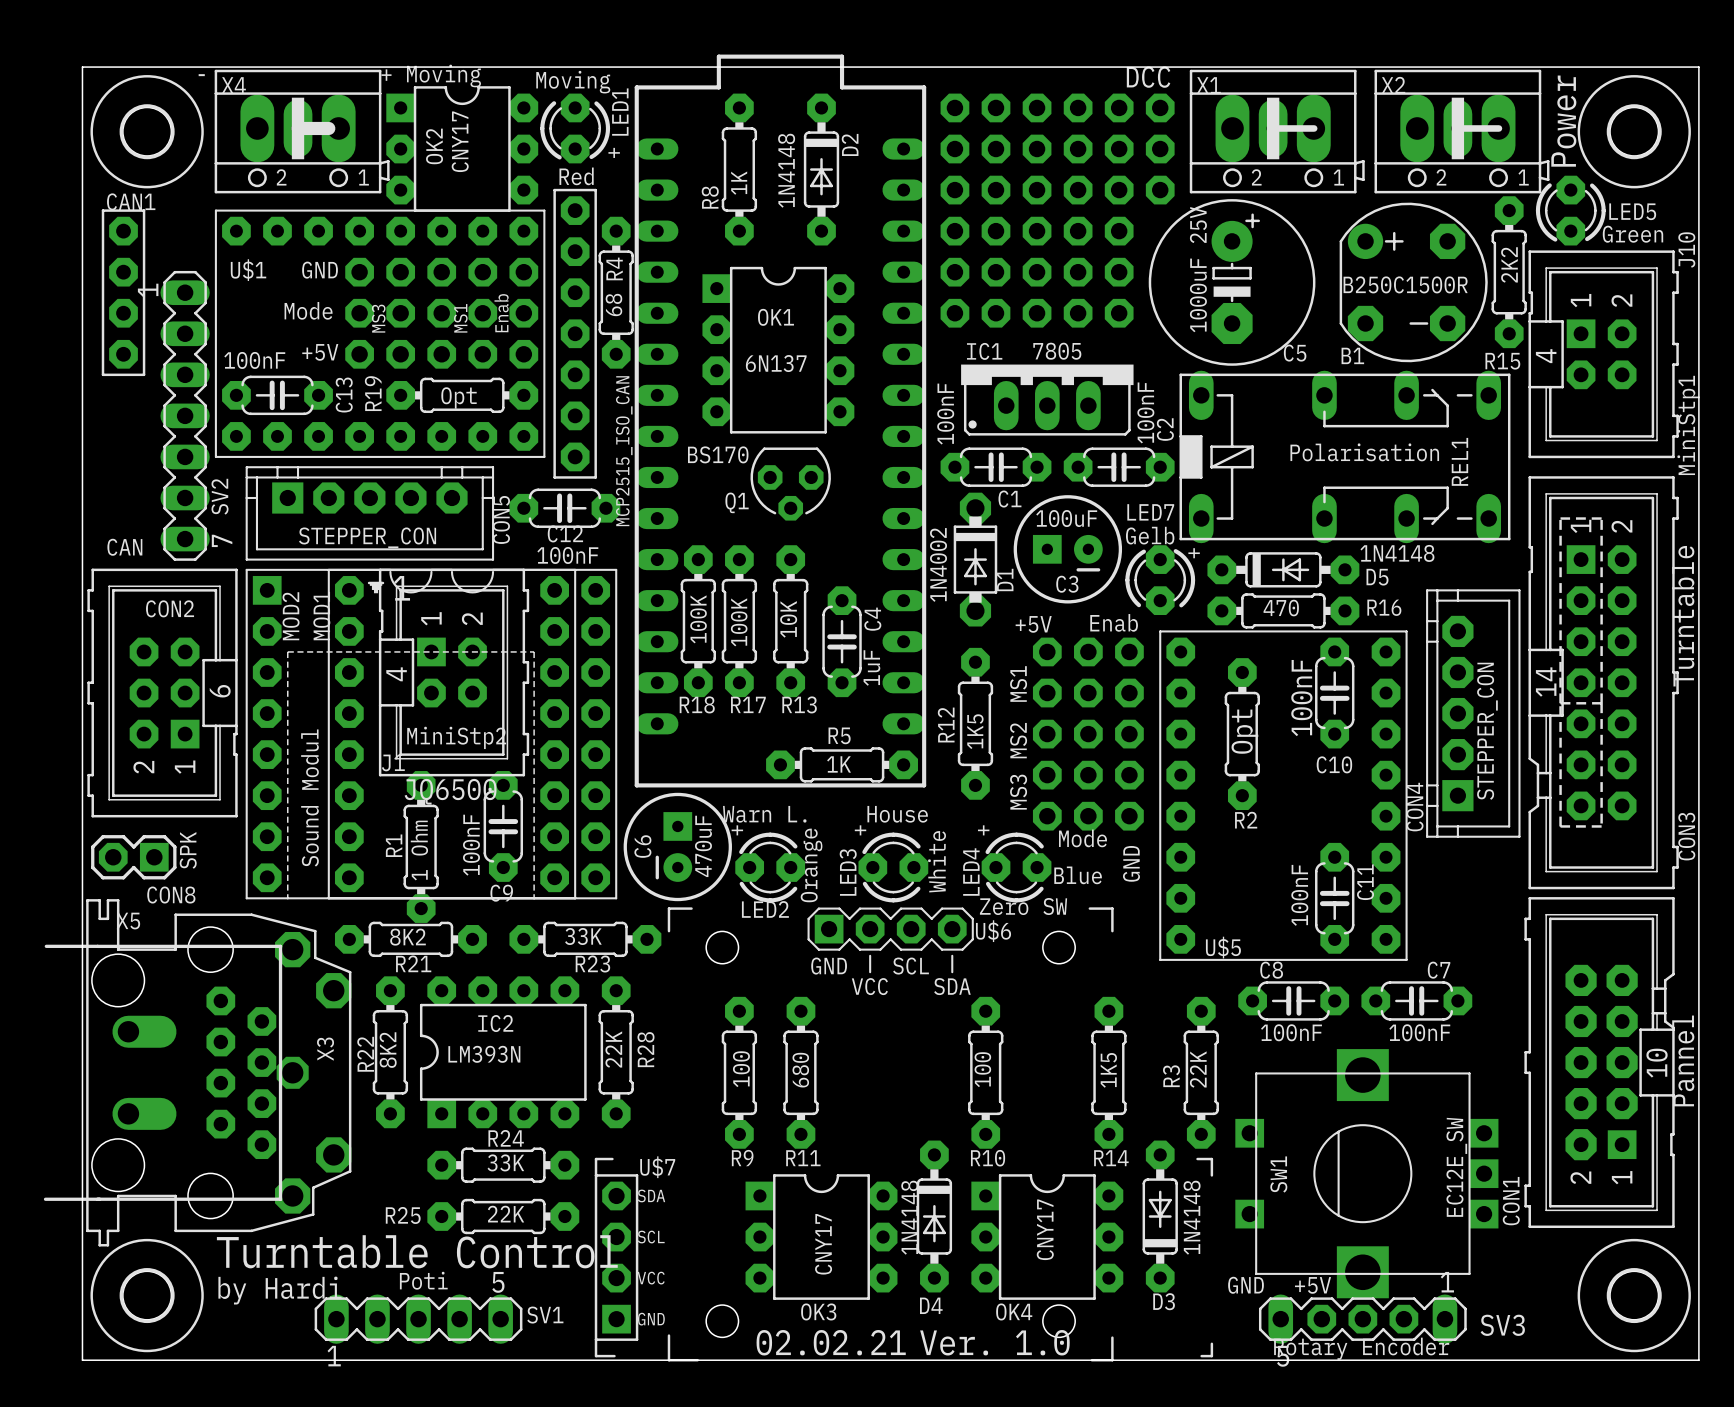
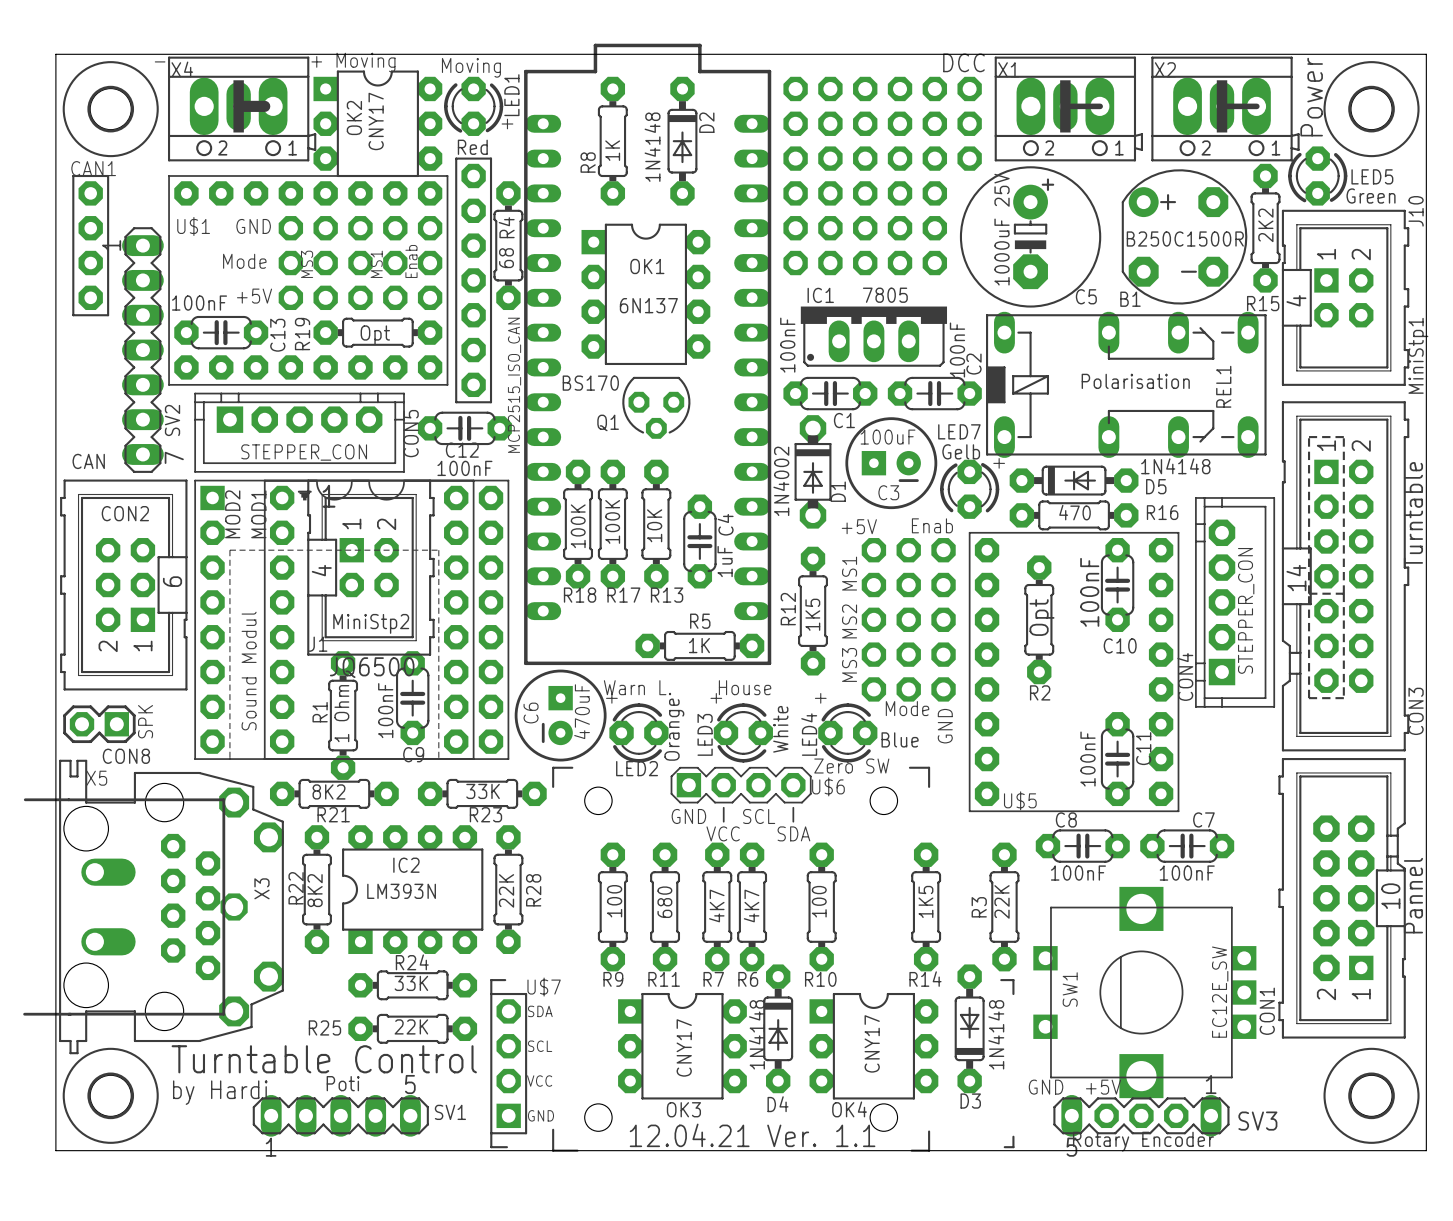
R7: none -> 4K7 (717, 906)
R6: none -> 4K7 (752, 906)
text: 02.02.21 (831, 1342) -> 12.04.21 (689, 1135)
text: Ver. 1.0 (994, 1342) -> Ver. 1.1 (821, 1135)

